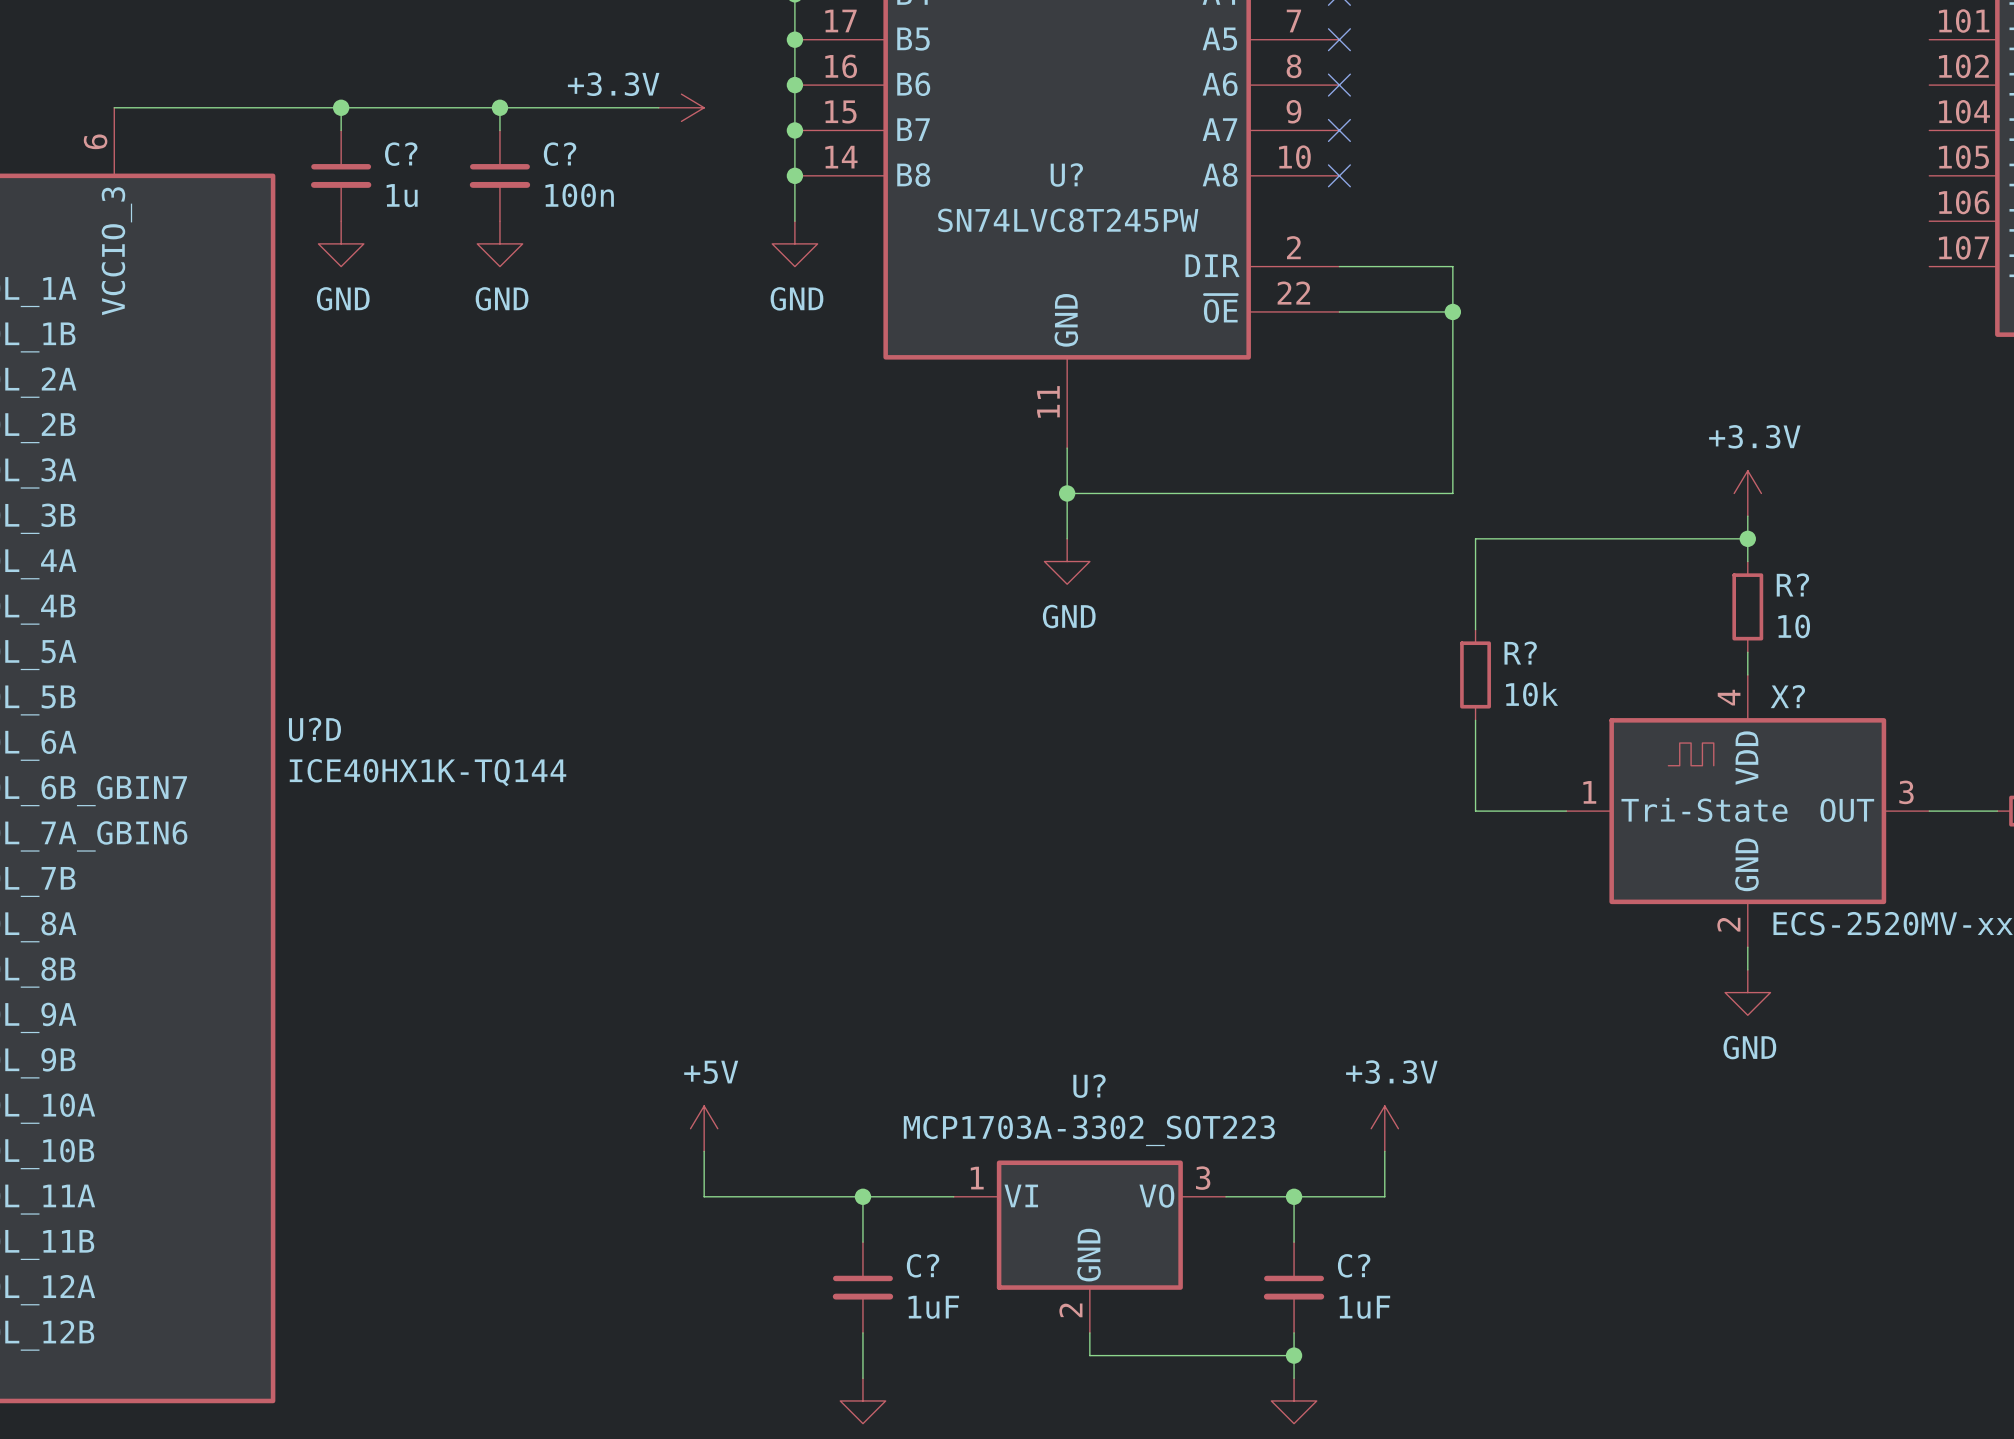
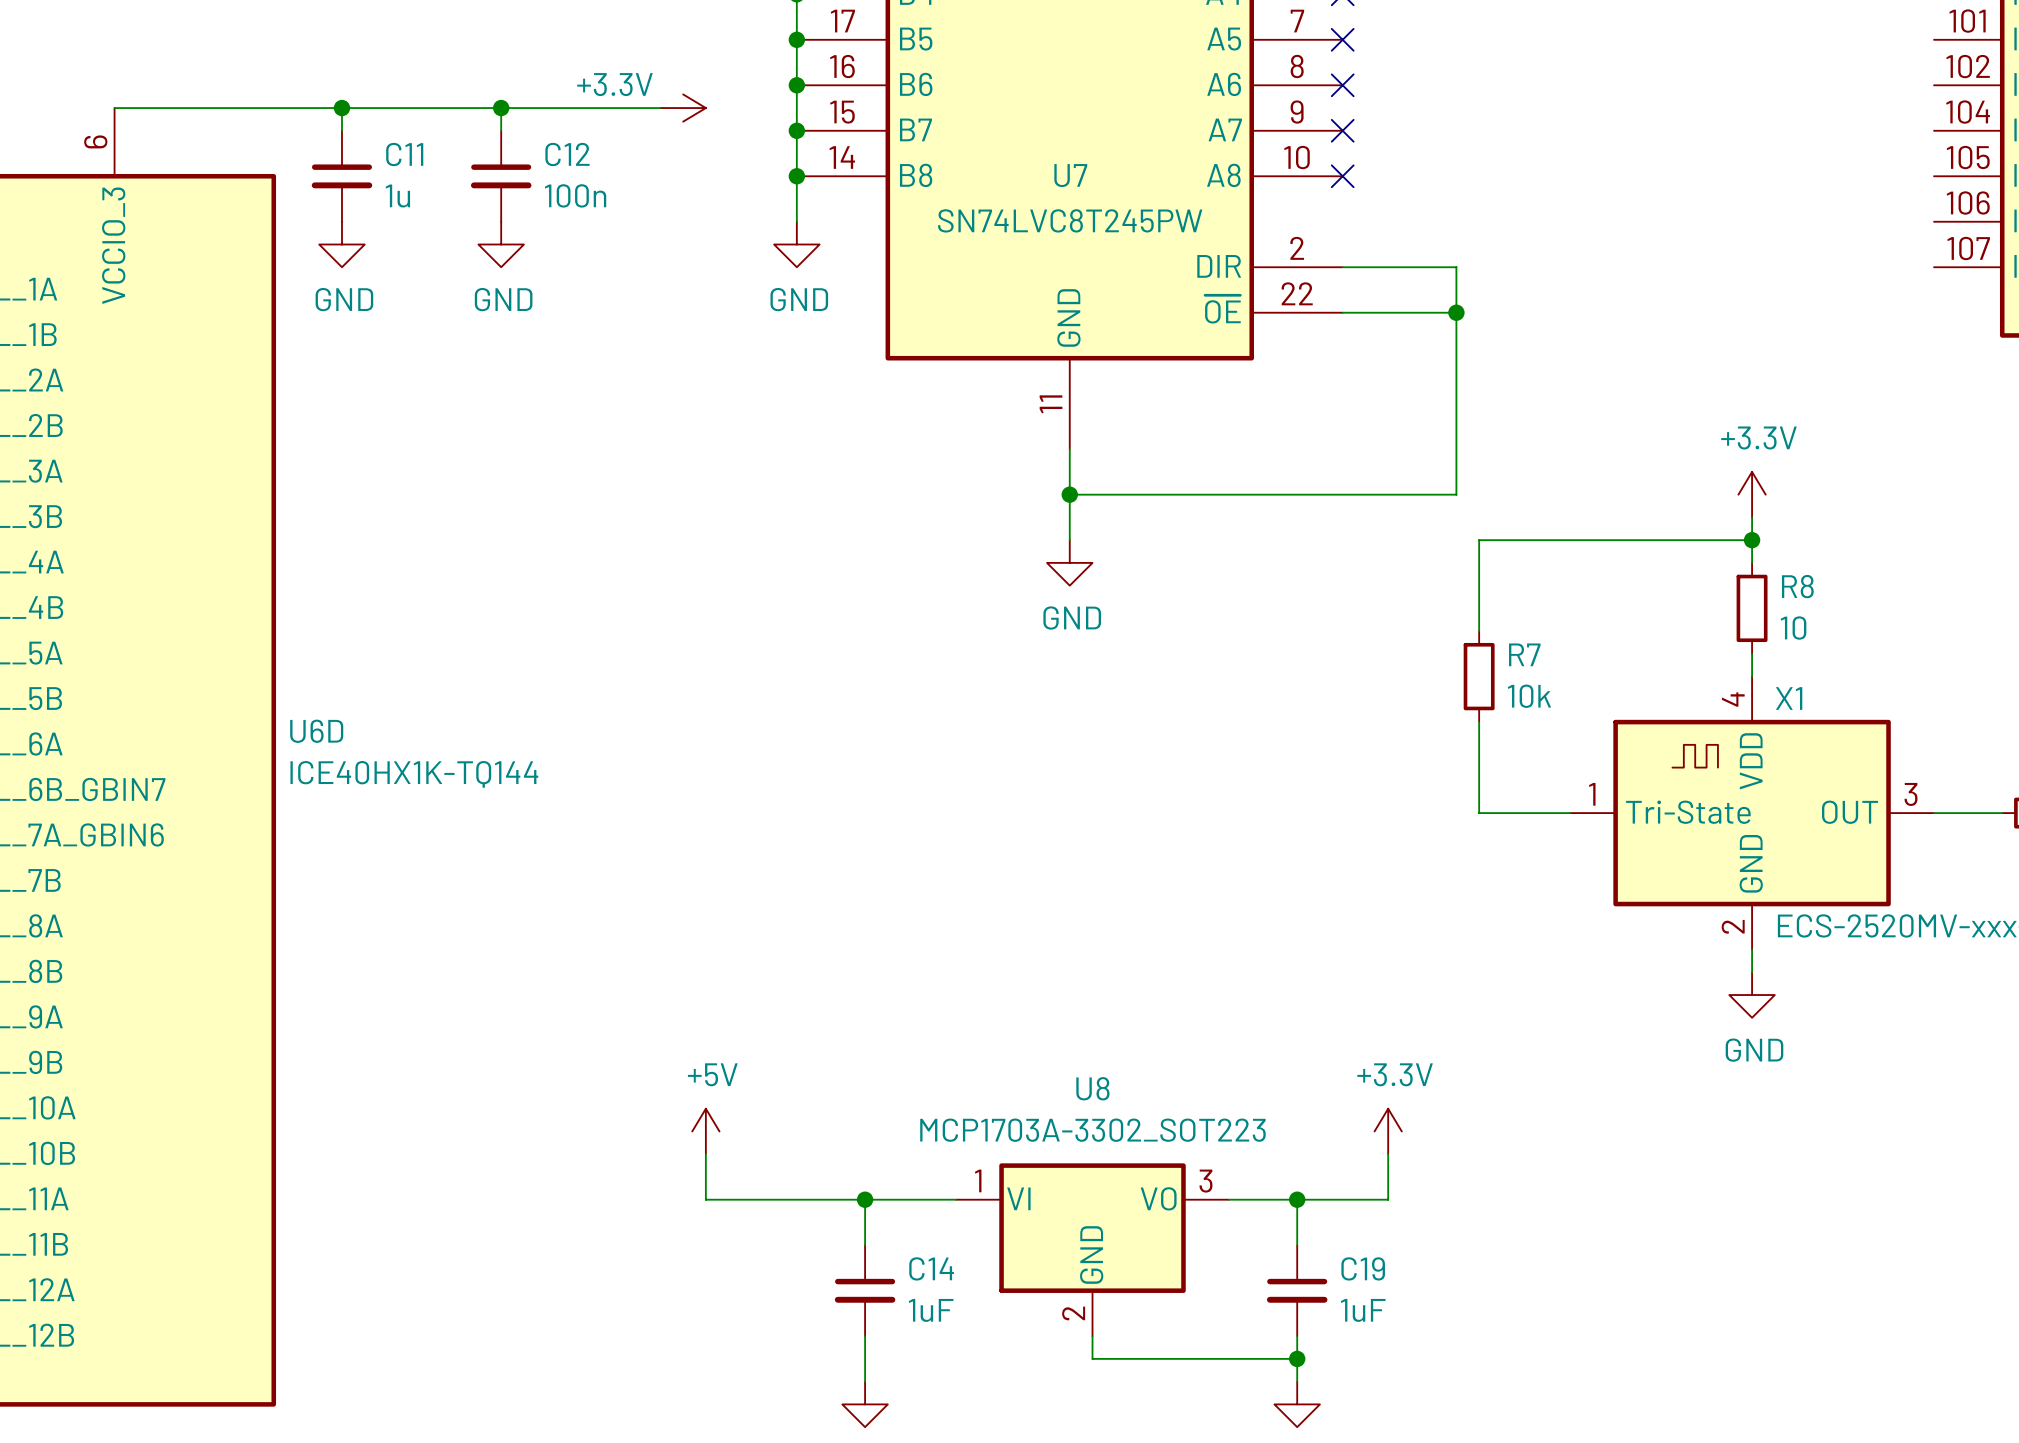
C? name: C? (401, 154) -> C11 (404, 154)
C? name: C? (560, 154) -> C12 (567, 154)
U? name: U? (1066, 175) -> U7 (1070, 175)
R? name: R? (1792, 584) -> R8 (1797, 586)
R? name: R? (1520, 653) -> R7 (1524, 654)
X? name: X? (1787, 696) -> X1 (1789, 698)
U?D name: U?D (314, 729) -> U6D (316, 731)
U? name: U? (1089, 1086) -> U8 (1092, 1088)
C? name: C? (923, 1265) -> C14 (931, 1268)
C? name: C? (1354, 1265) -> C19 (1363, 1268)

